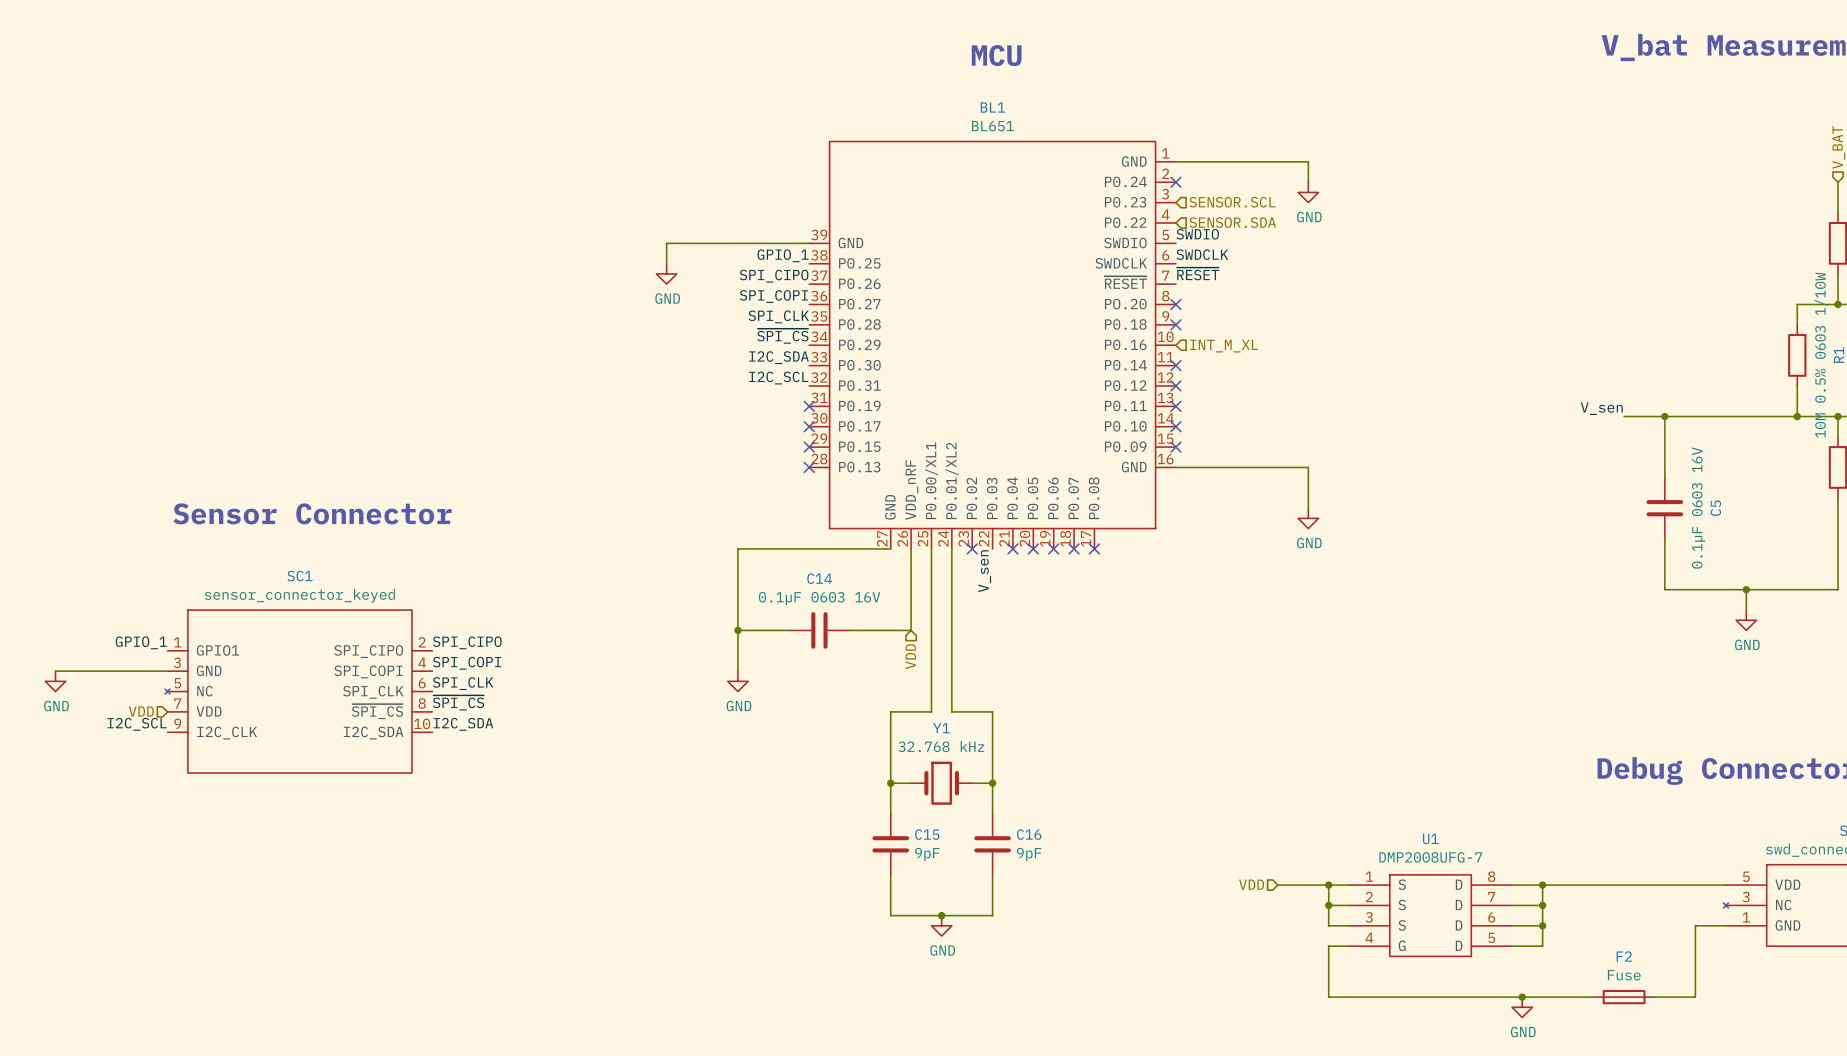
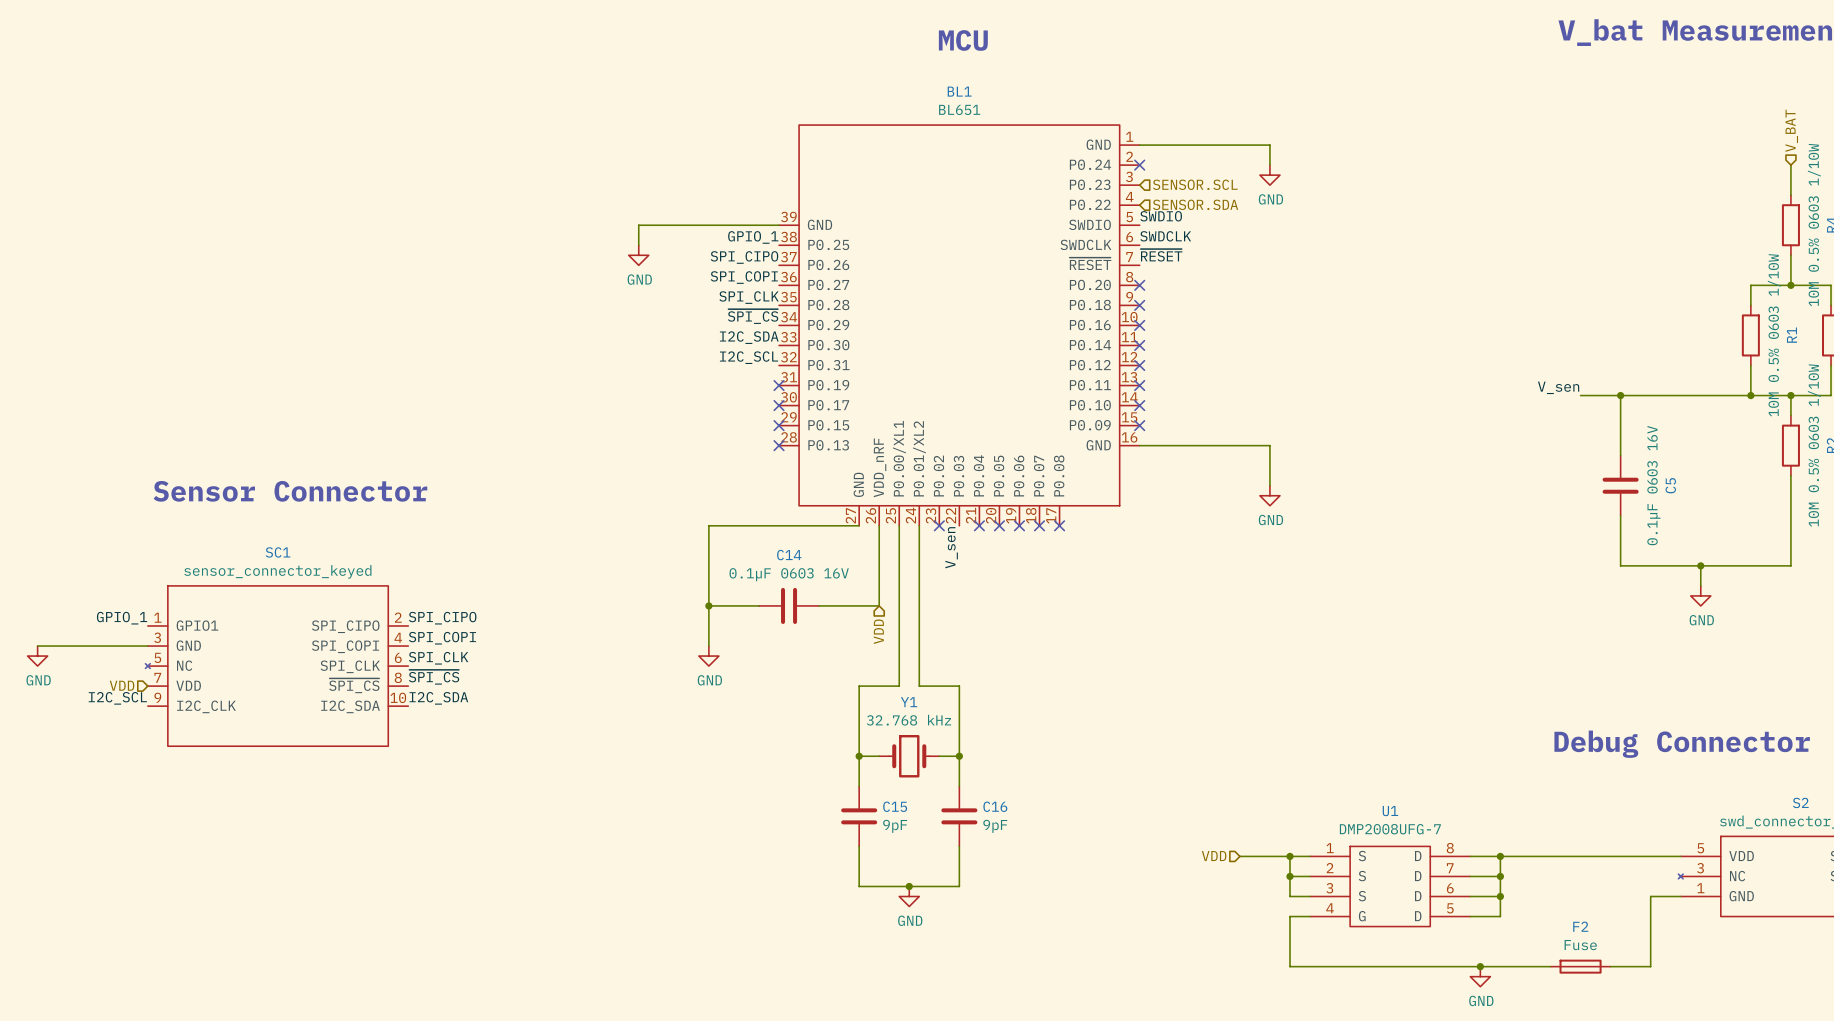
no-connect mark: none -> (1139, 325)
hierarchical label: INT_M_XL (1224, 346) -> none

